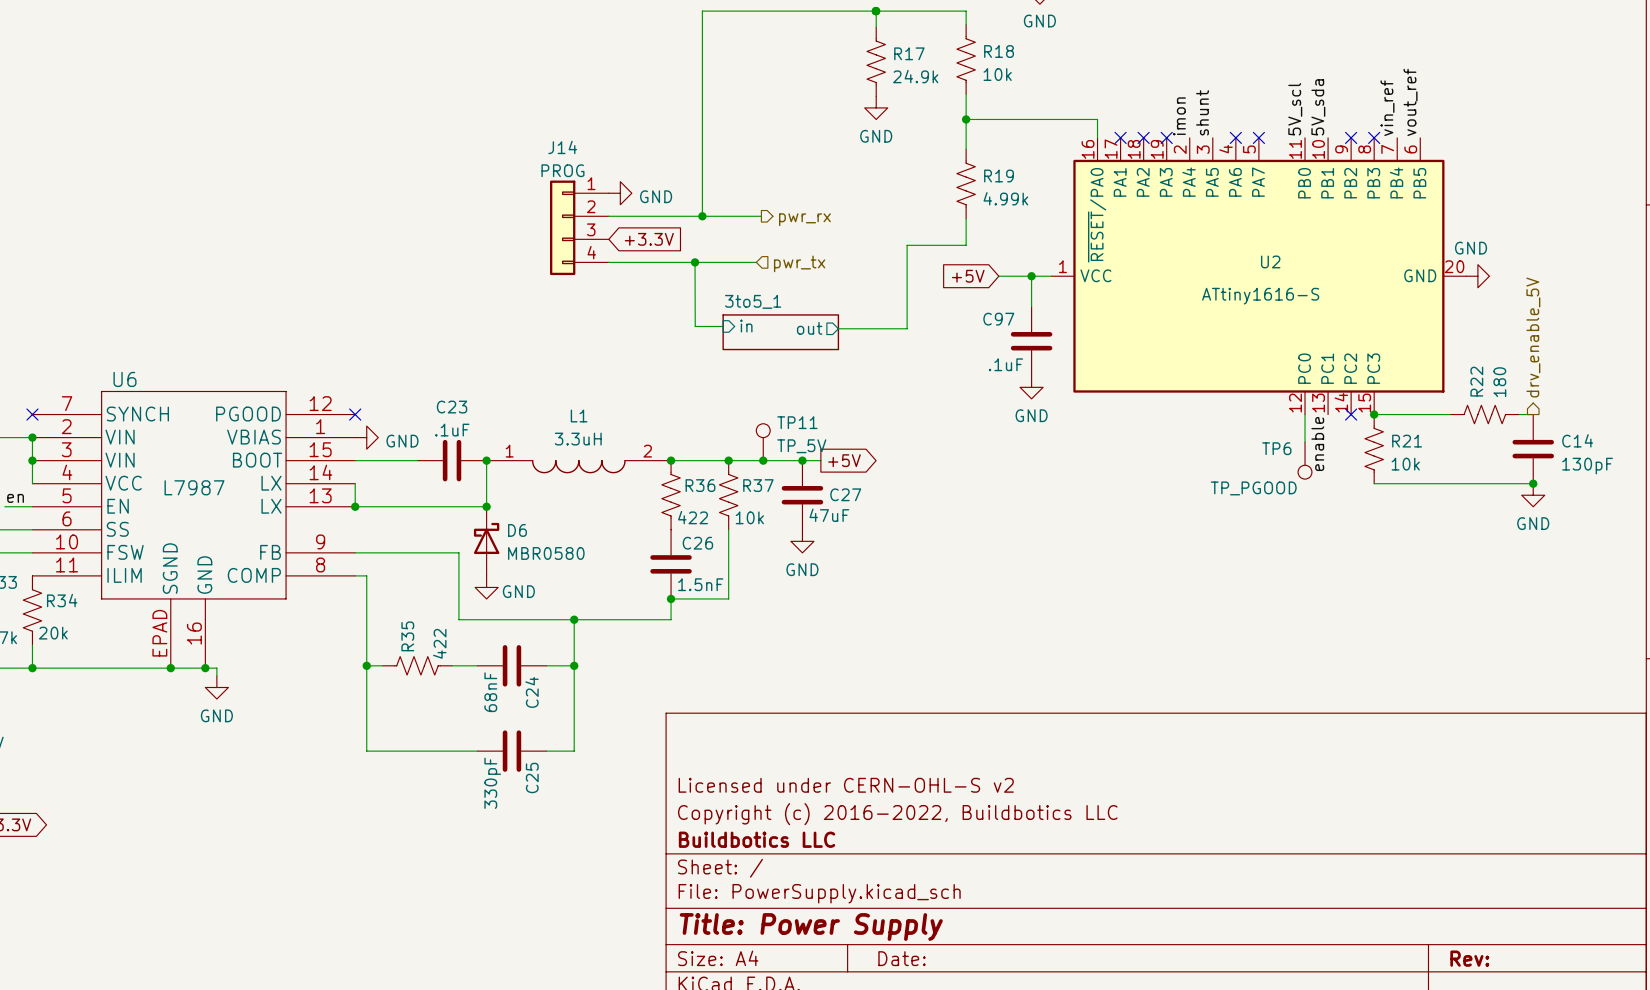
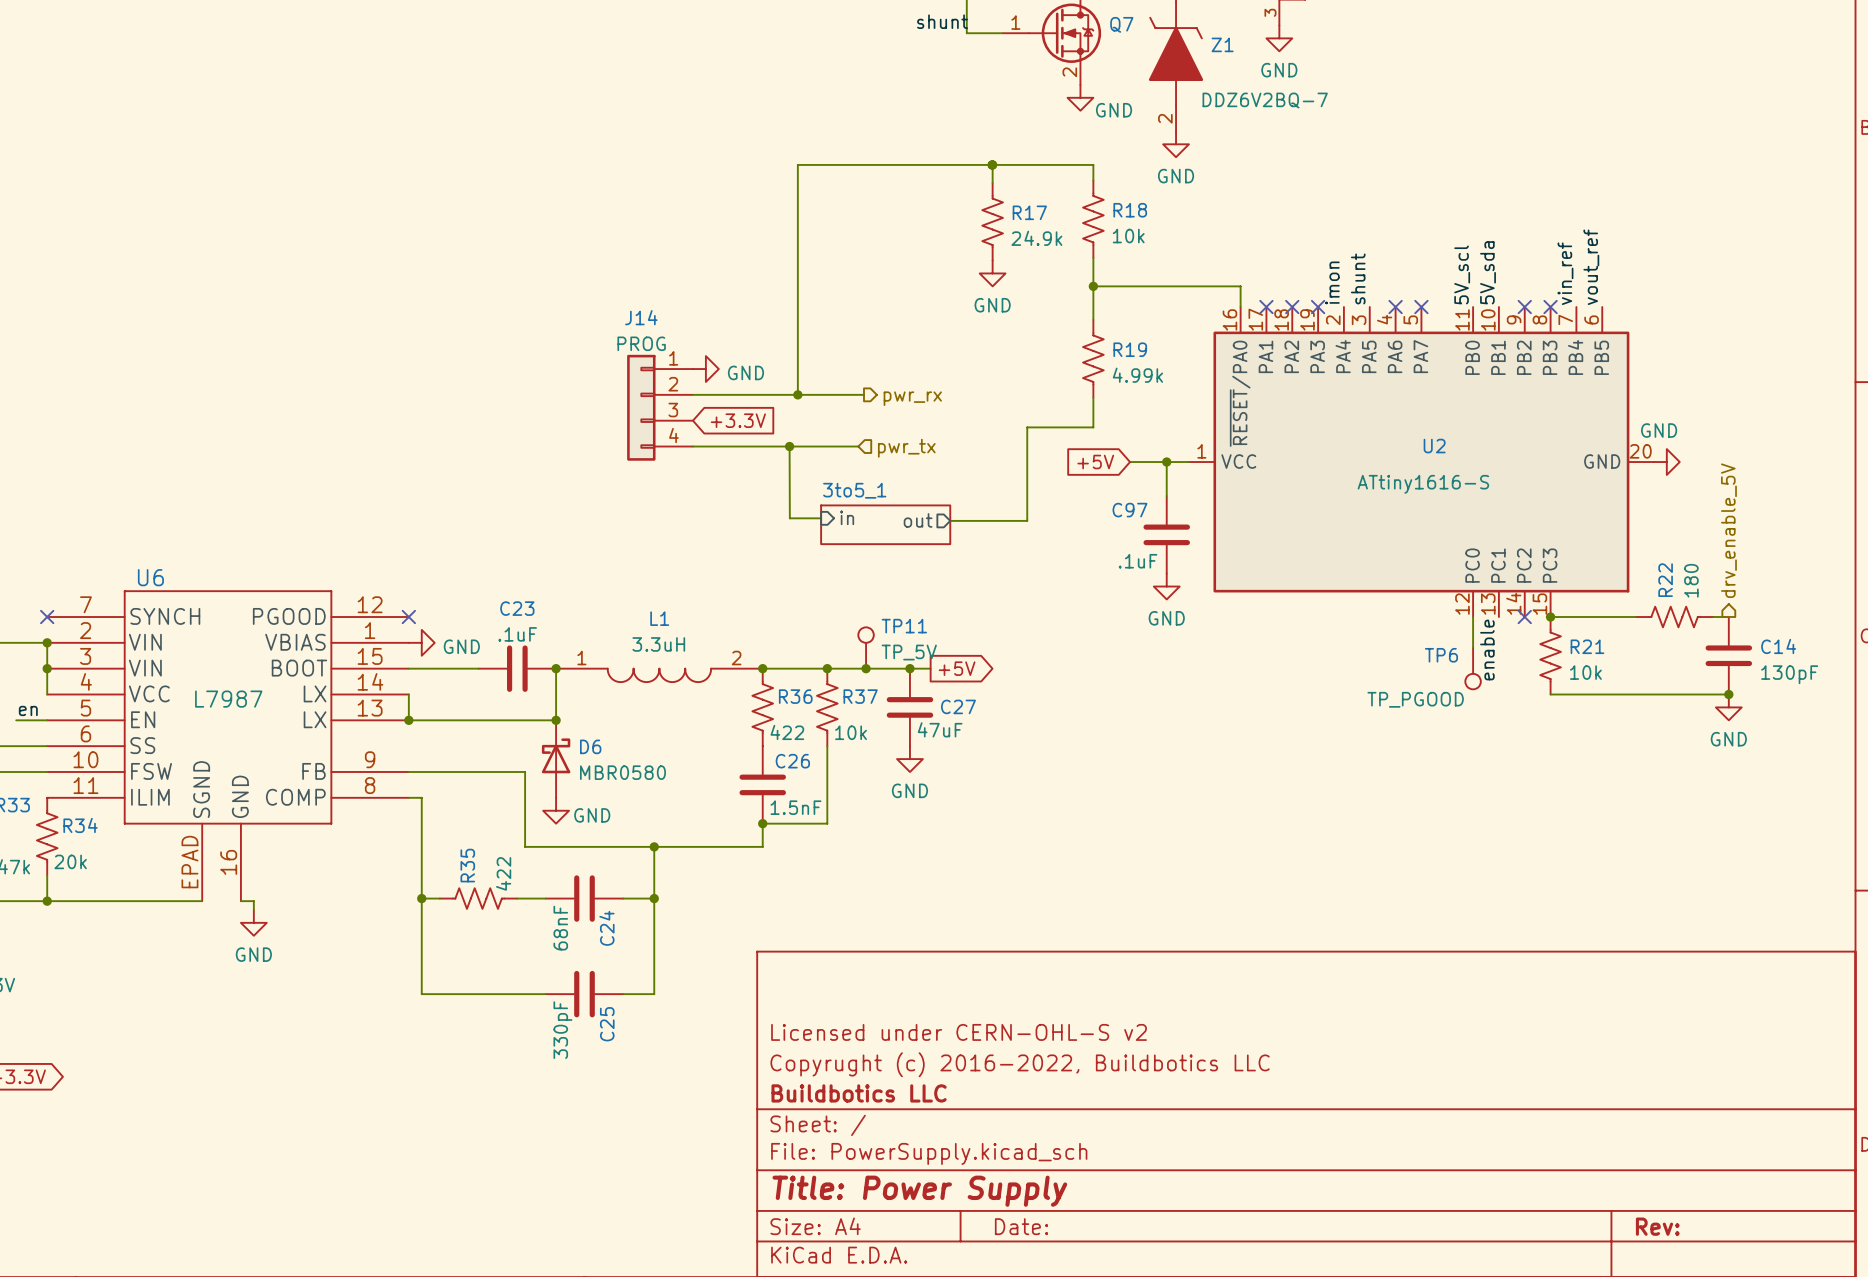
wire: (170, 668) (205, 668) -> none
junction: (170, 668) -> none
junction: (205, 668) -> none
title block: Copyright (c) 2016-2022, Buildbotics LLC (897, 814) -> Copyrught (c) 2016-2022, Buildbotics LLC (1020, 1064)

